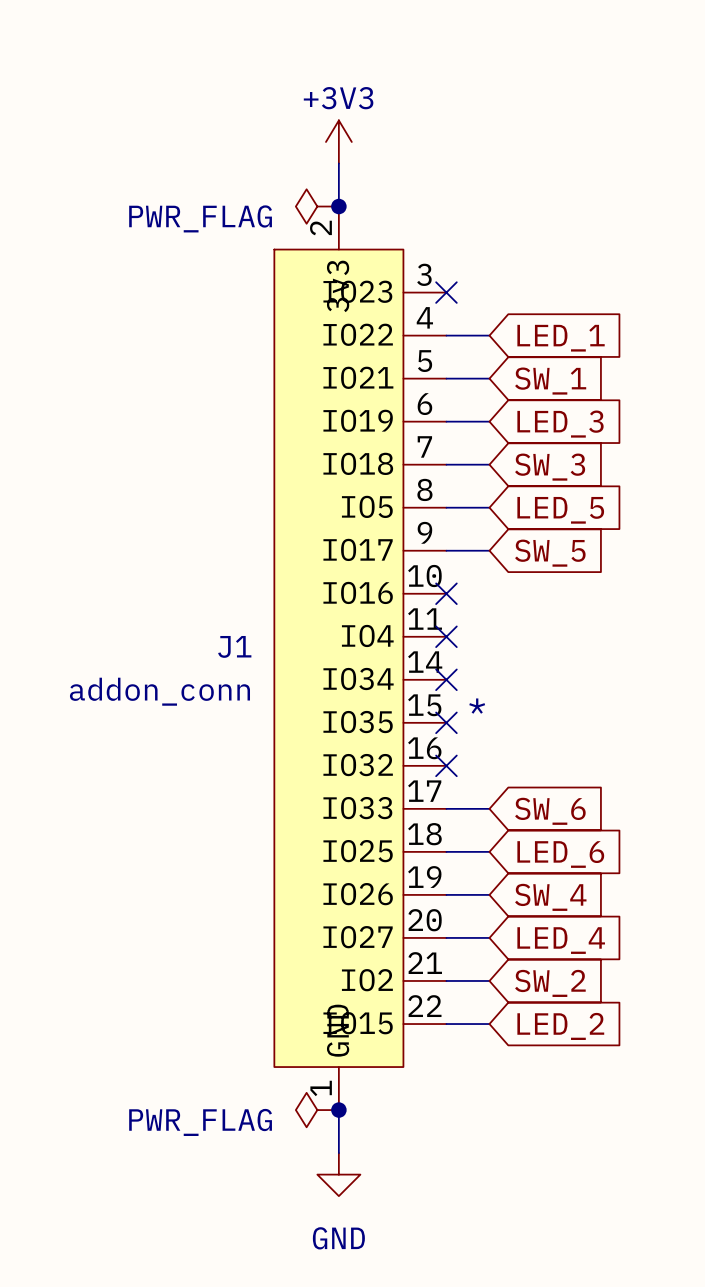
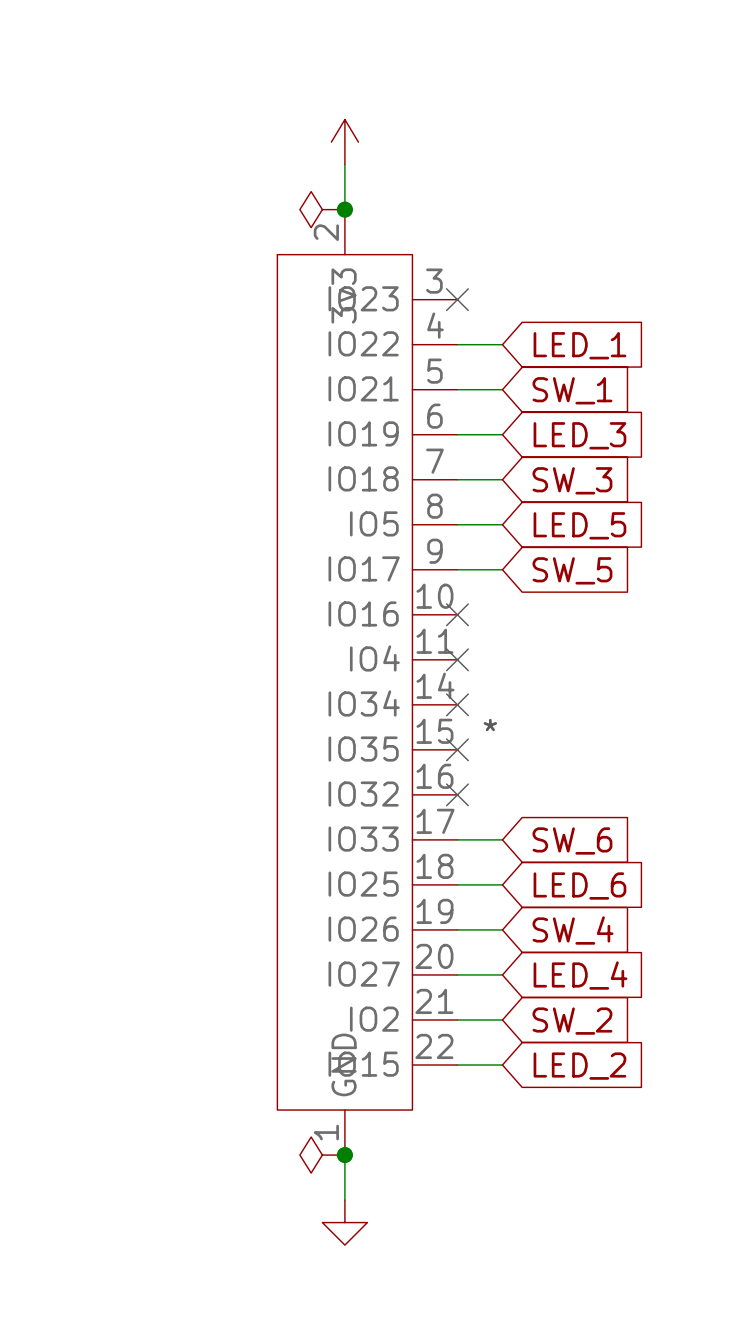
power symbol text: +3V3 (338, 98) -> none
power symbol text: PWR_FLAG (200, 218) -> none
J1 name: J1 (234, 646) -> none
J1 value: addon_conn (159, 691) -> none
power symbol text: PWR_FLAG (200, 1122) -> none
power symbol text: GND (338, 1238) -> none

